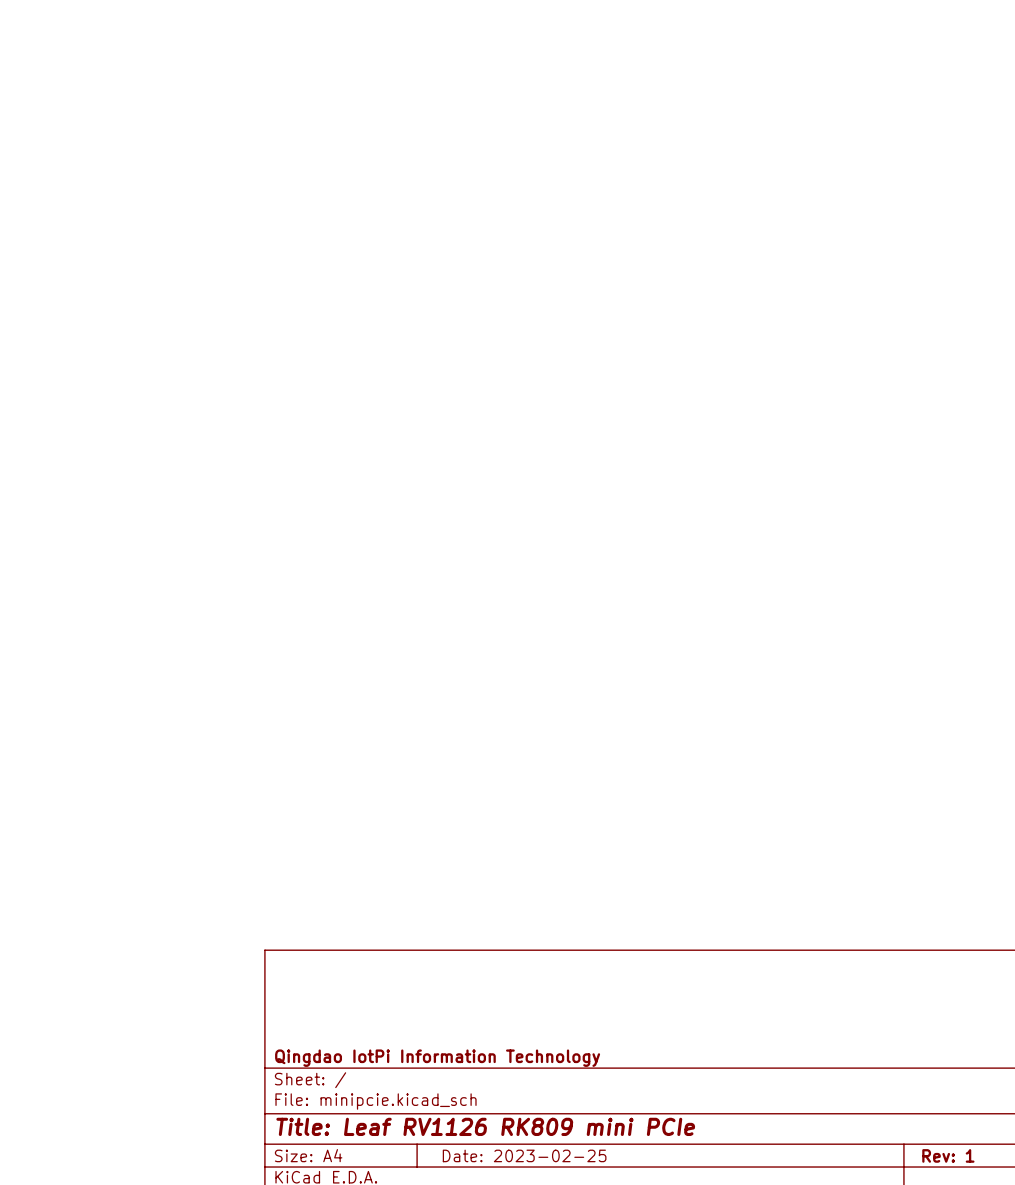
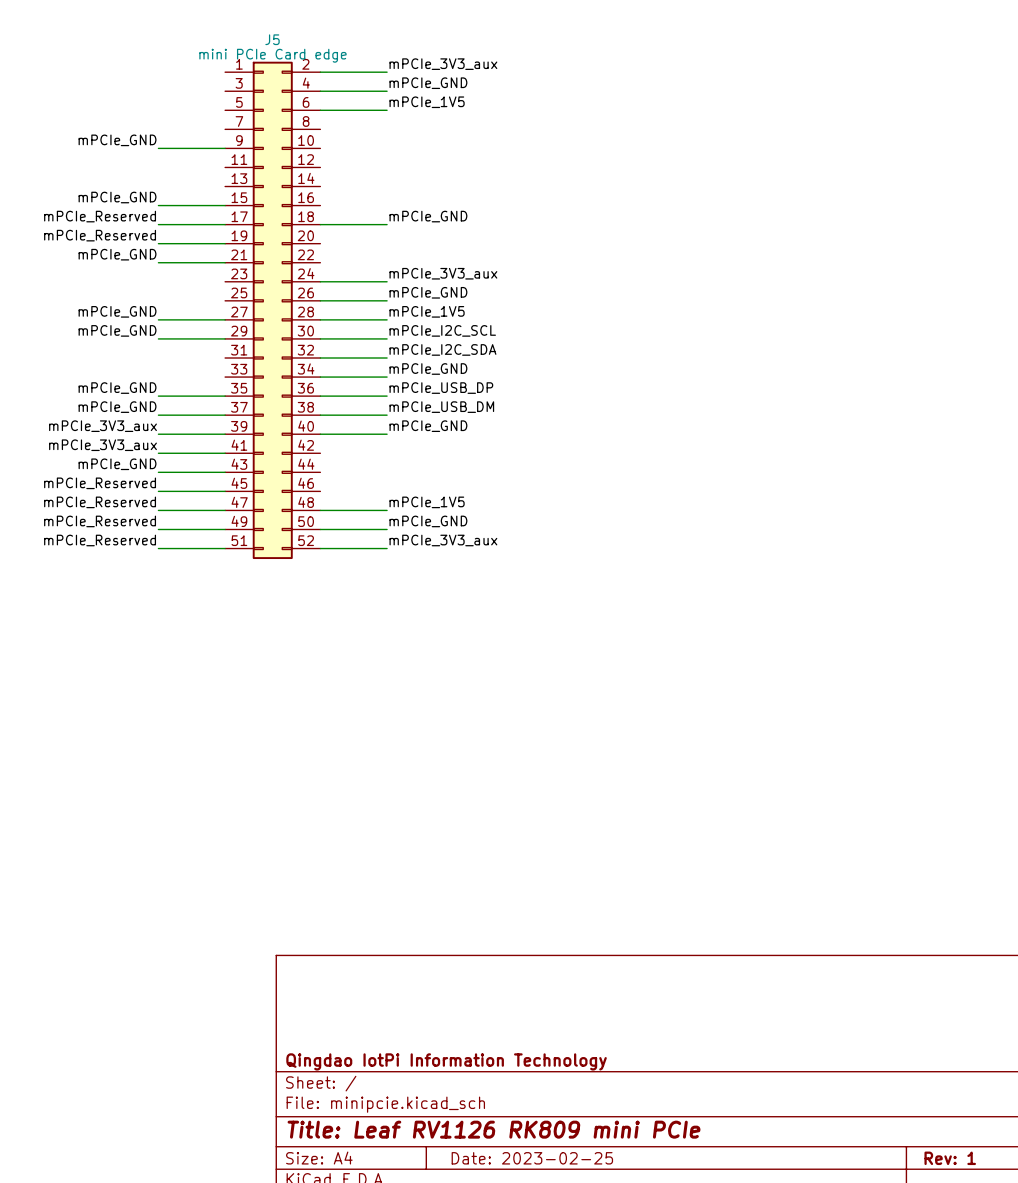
label: none -> mPCIe_3V3_aux (443, 64)
wire: none -> (320, 72) (387, 72)
label: none -> mPCIe_GND (428, 83)
wire: none -> (320, 91) (387, 91)
label: none -> mPCIe_1V5 (427, 102)
wire: none -> (320, 110) (387, 110)
label: none -> mPCIe_GND (117, 140)
wire: none -> (158, 148) (225, 148)
label: none -> mPCIe_GND (117, 197)
wire: none -> (158, 205) (225, 205)
label: none -> mPCIe_Reserved (100, 216)
label: none -> mPCIe_GND (428, 216)
wire: none -> (158, 224) (225, 224)
wire: none -> (320, 224) (387, 224)
label: none -> mPCIe_Reserved (100, 235)
wire: none -> (158, 243) (225, 243)
label: none -> mPCIe_GND (117, 254)
wire: none -> (158, 262) (225, 262)
label: none -> mPCIe_3V3_aux (443, 273)
wire: none -> (320, 281) (387, 281)
label: none -> mPCIe_GND (428, 292)
wire: none -> (320, 300) (387, 300)
J5: none -> mini PCIe Card edge (272, 310)
label: none -> mPCIe_GND (117, 311)
label: none -> mPCIe_1V5 (427, 311)
wire: none -> (158, 319) (225, 319)
wire: none -> (320, 319) (387, 319)
label: none -> mPCIe_GND (117, 330)
label: none -> mPCIe_I2C_SCL (442, 330)
wire: none -> (158, 338) (225, 338)
wire: none -> (320, 338) (387, 338)
label: none -> mPCIe_I2C_SDA (442, 349)
wire: none -> (320, 358) (387, 358)
label: none -> mPCIe_GND (428, 369)
wire: none -> (320, 377) (387, 377)
label: none -> mPCIe_GND (117, 388)
label: none -> mPCIe_USB_DP (441, 388)
wire: none -> (158, 396) (225, 396)
wire: none -> (320, 396) (387, 396)
label: none -> mPCIe_GND (117, 407)
label: none -> mPCIe_USB_DM (441, 407)
wire: none -> (158, 415) (225, 415)
wire: none -> (320, 415) (387, 415)
label: none -> mPCIe_3V3_aux (103, 426)
label: none -> mPCIe_GND (428, 426)
wire: none -> (158, 434) (225, 434)
wire: none -> (320, 434) (387, 434)
label: none -> mPCIe_3V3_aux (103, 445)
wire: none -> (158, 453) (225, 453)
label: none -> mPCIe_GND (117, 464)
wire: none -> (158, 472) (225, 472)
label: none -> mPCIe_Reserved (100, 483)
wire: none -> (158, 491) (225, 491)
label: none -> mPCIe_Reserved (100, 502)
label: none -> mPCIe_1V5 (427, 502)
wire: none -> (158, 510) (225, 510)
wire: none -> (320, 510) (387, 510)
label: none -> mPCIe_Reserved (100, 521)
label: none -> mPCIe_GND (428, 521)
wire: none -> (158, 529) (225, 529)
wire: none -> (320, 529) (387, 529)
label: none -> mPCIe_Reserved (100, 540)
label: none -> mPCIe_3V3_aux (443, 540)
wire: none -> (158, 548) (225, 548)
wire: none -> (320, 548) (387, 548)

